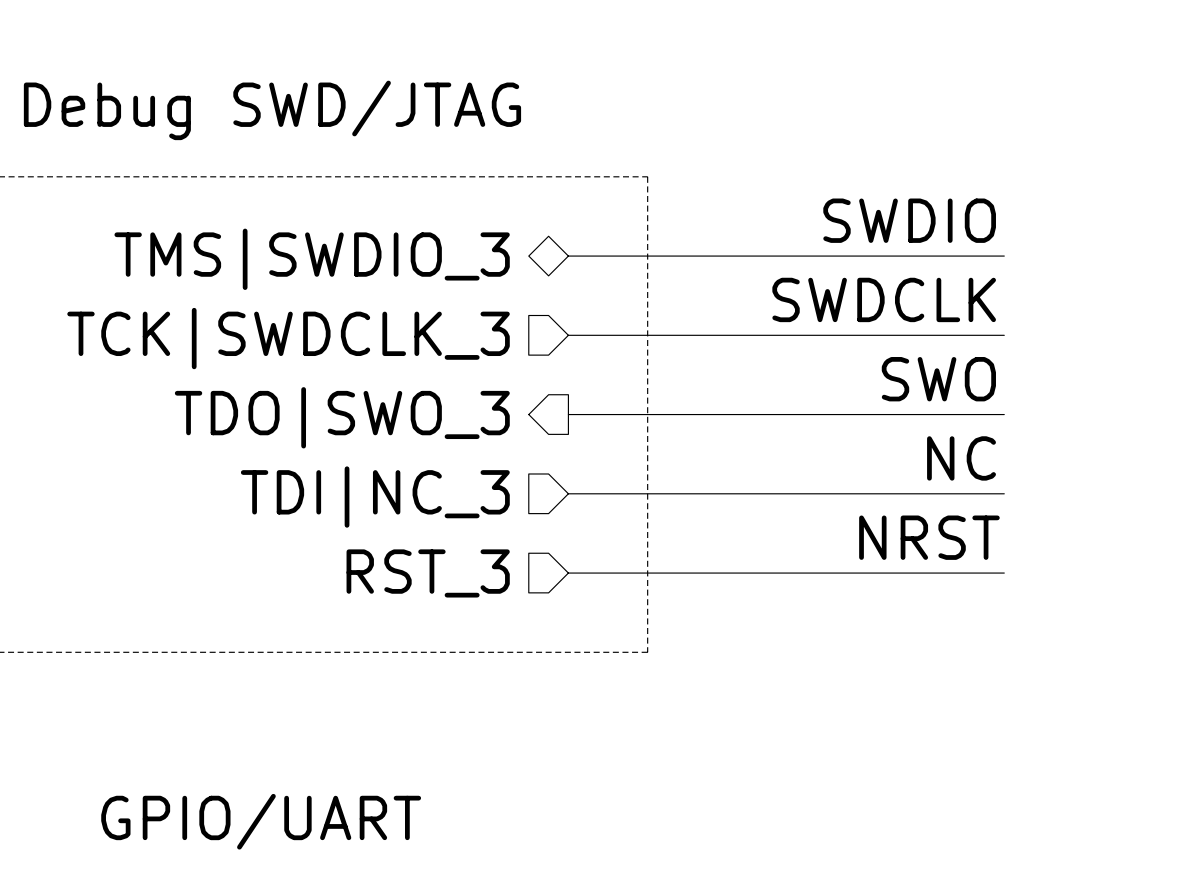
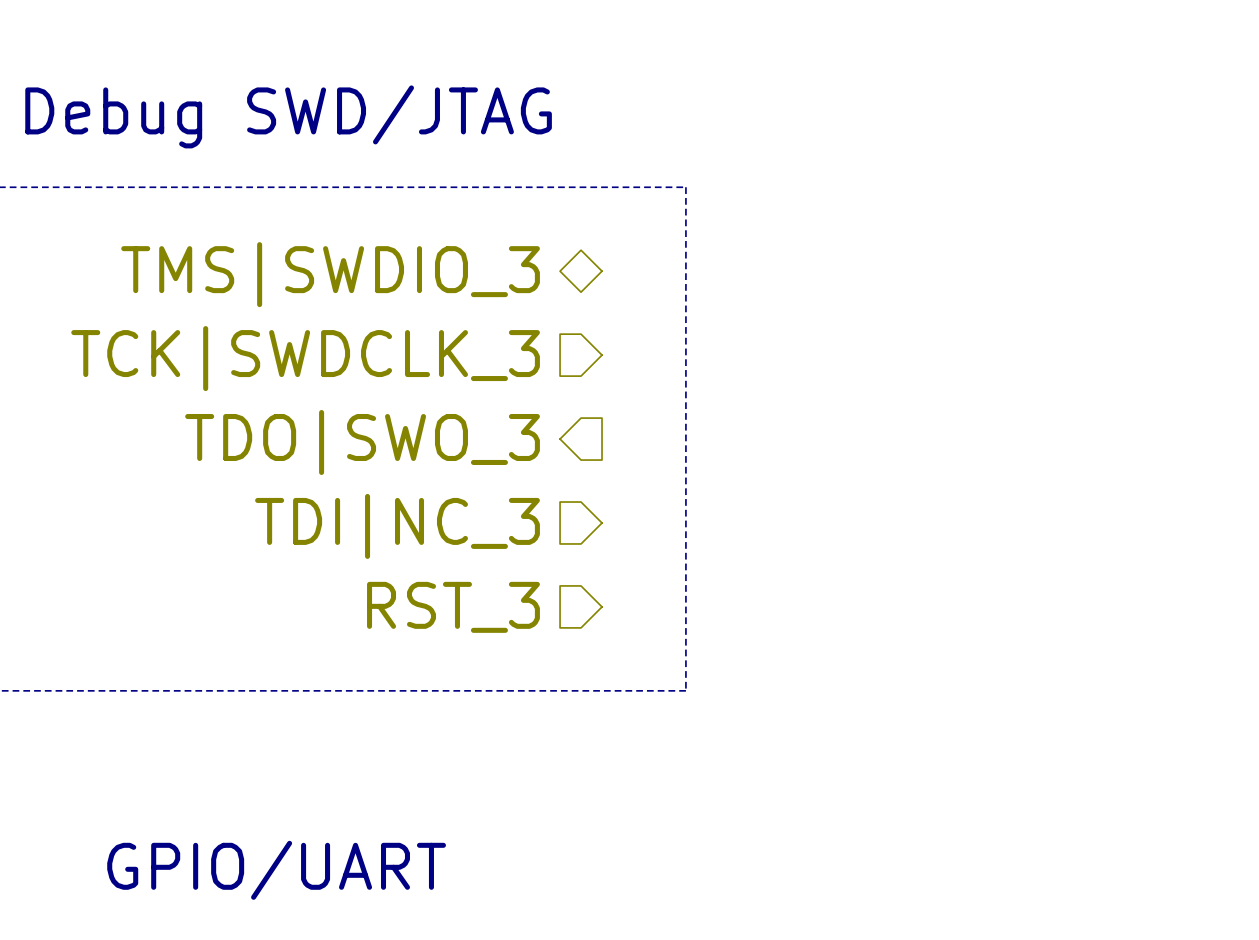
label: SWDIO (909, 220) -> none
wire: (568, 256) (1004, 256) -> none
label: SWDCLK (884, 299) -> none
wire: (568, 335) (1004, 335) -> none
label: SWO (938, 379) -> none
wire: (568, 414) (1004, 414) -> none
label: NC (961, 458) -> none
wire: (568, 493) (1004, 493) -> none
label: NRST (929, 537) -> none
wire: (568, 573) (1004, 573) -> none

